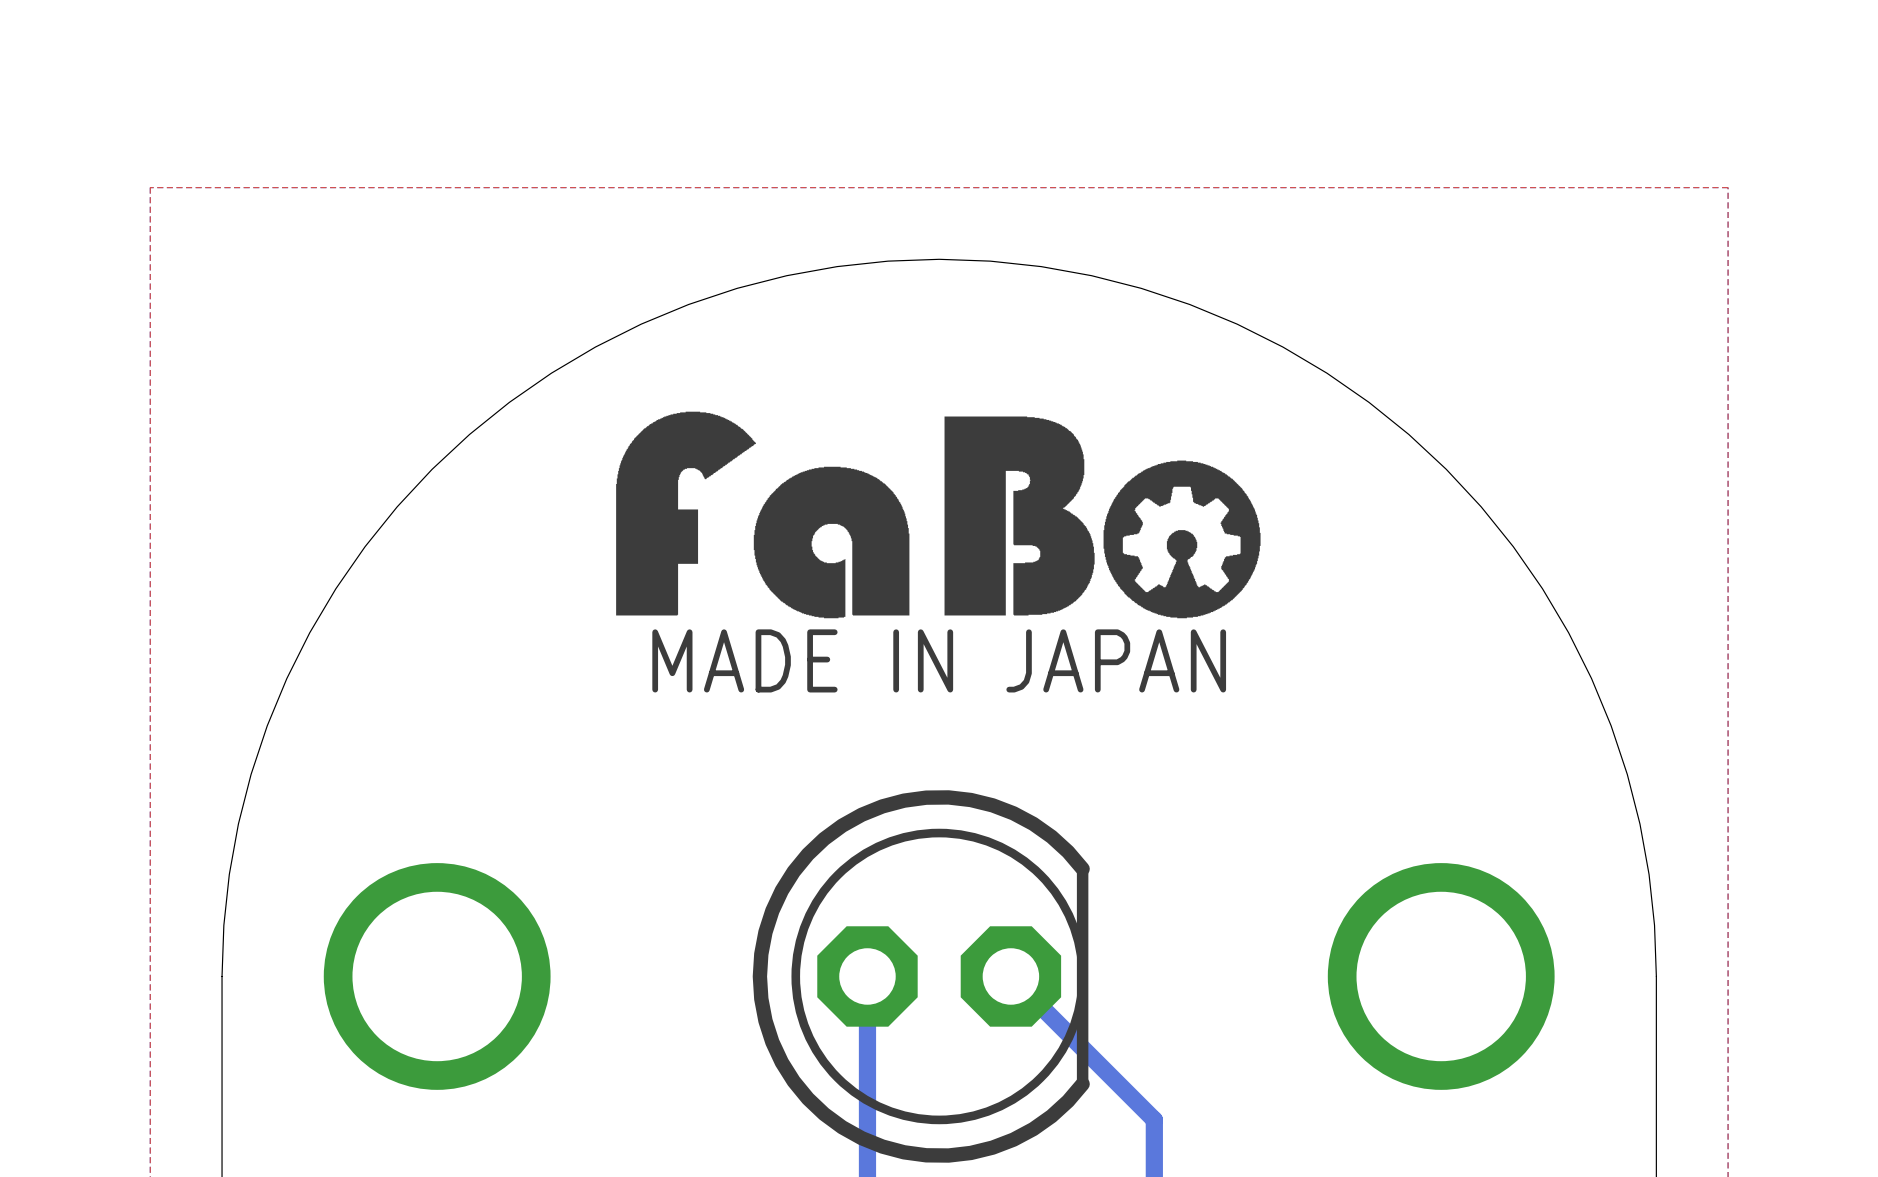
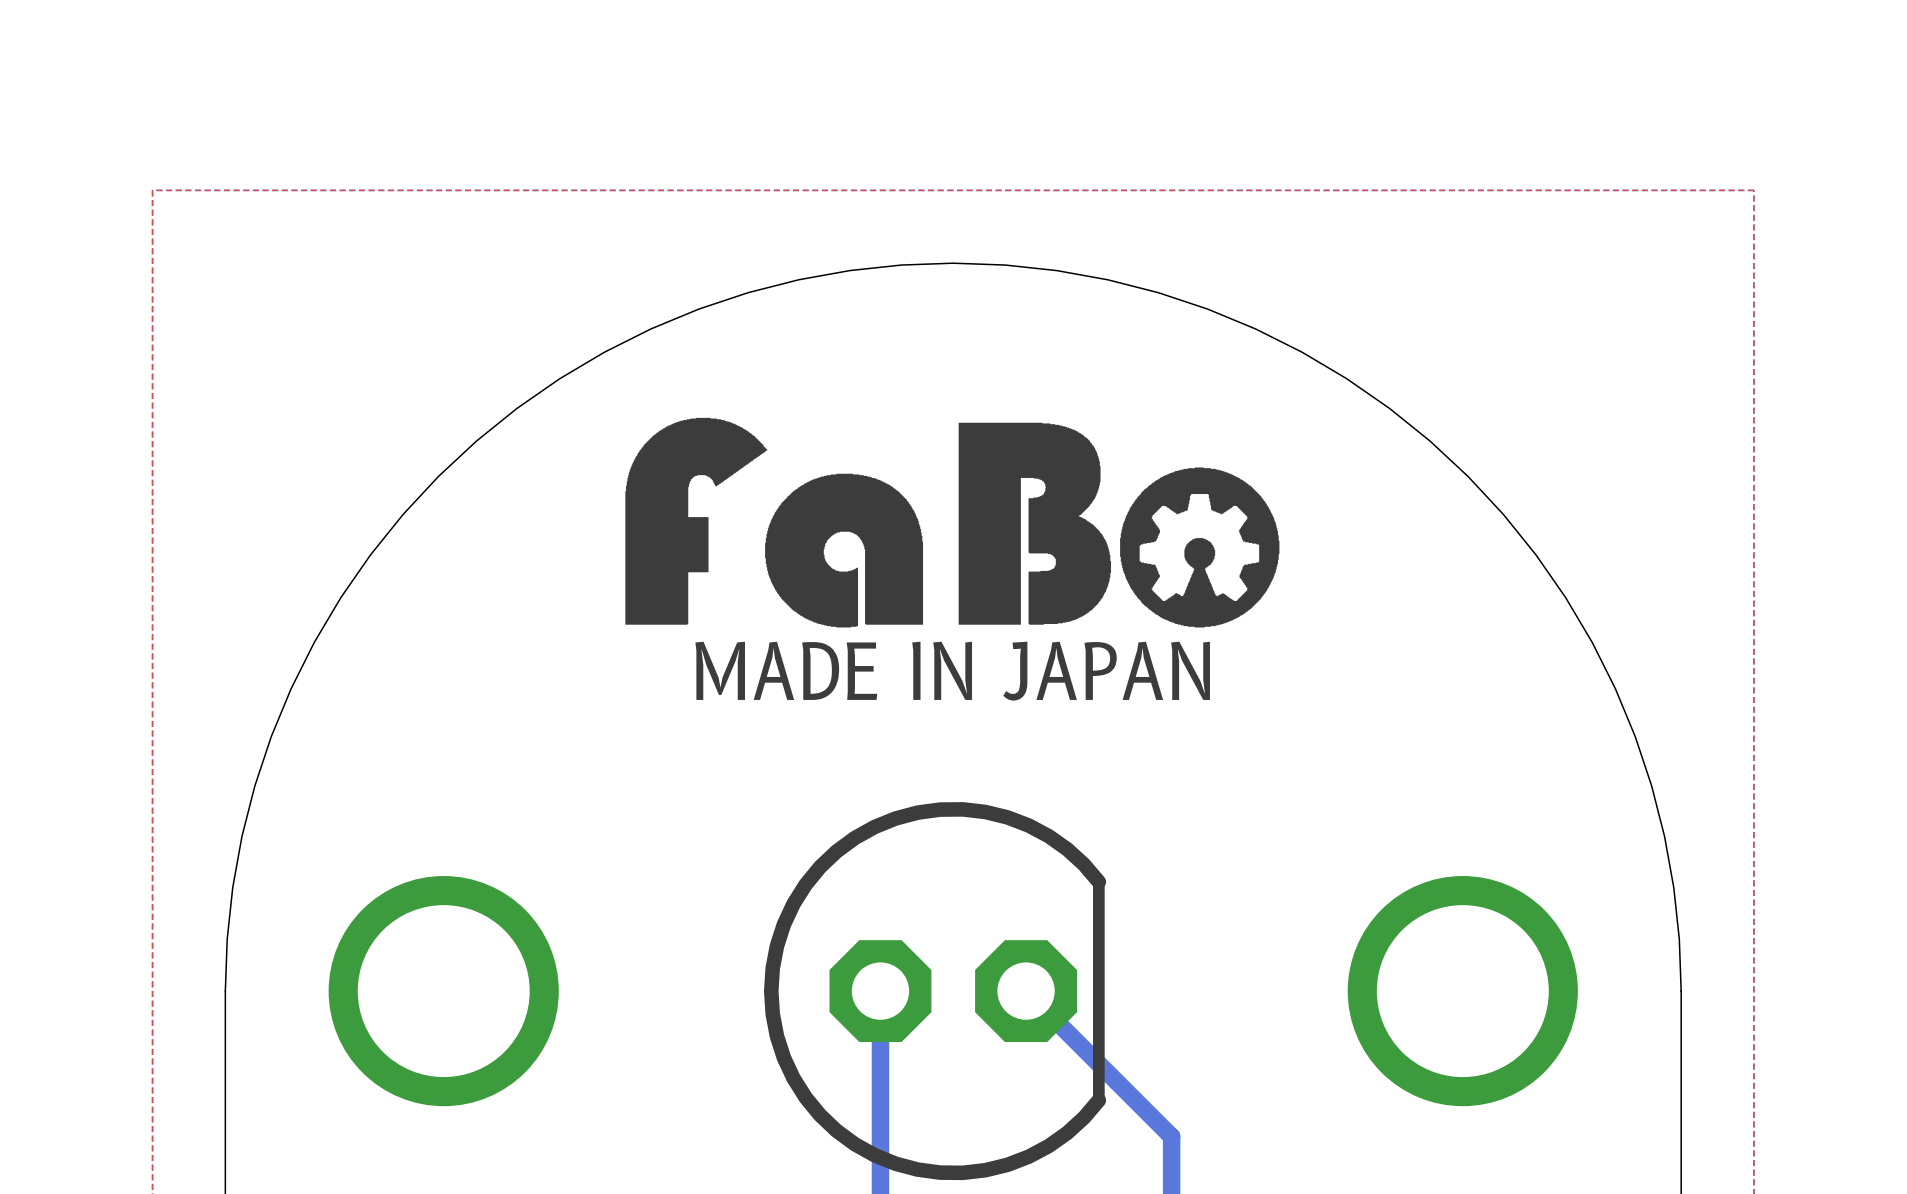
part footprint: [752, 790, 1090, 1163] -> [764, 802, 1107, 1181]

